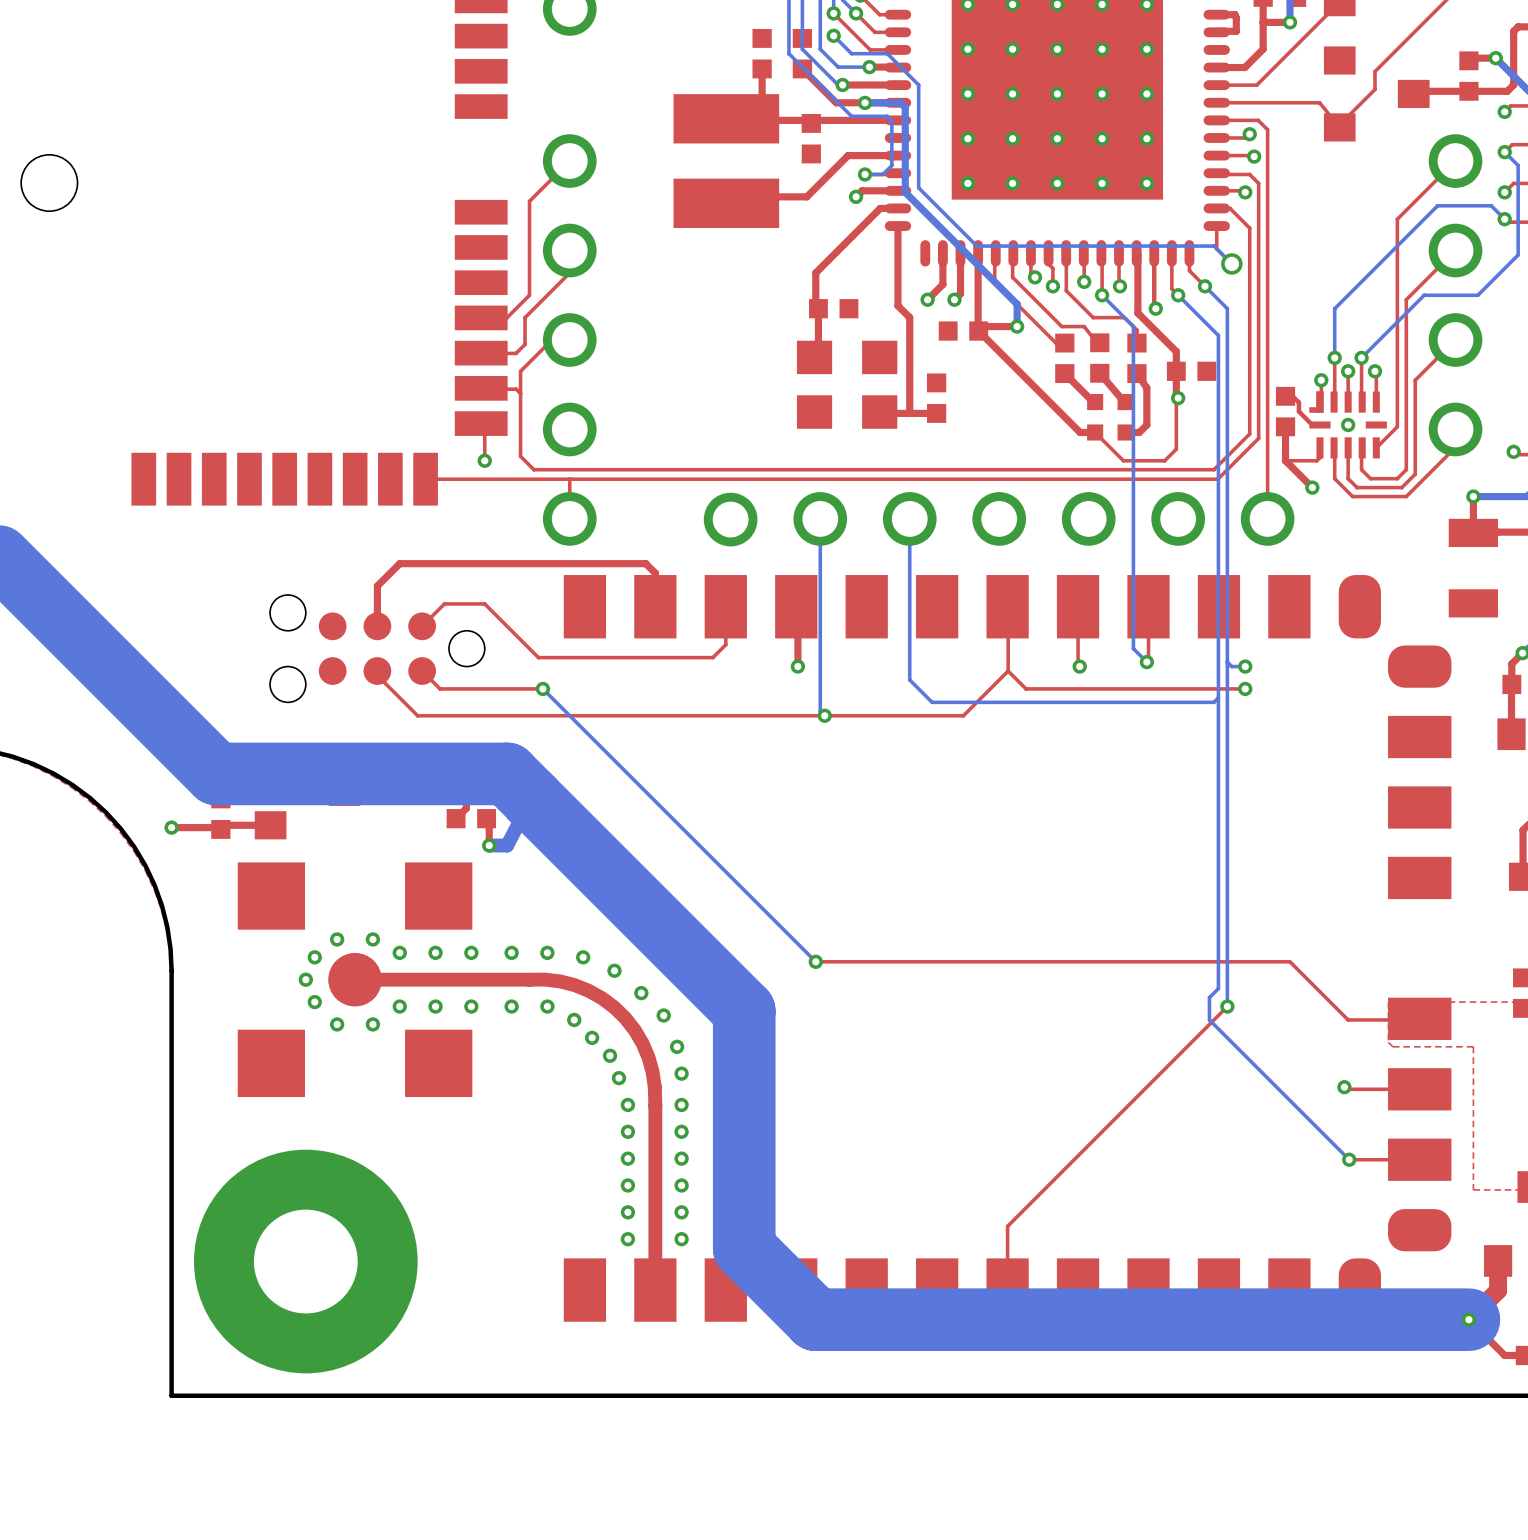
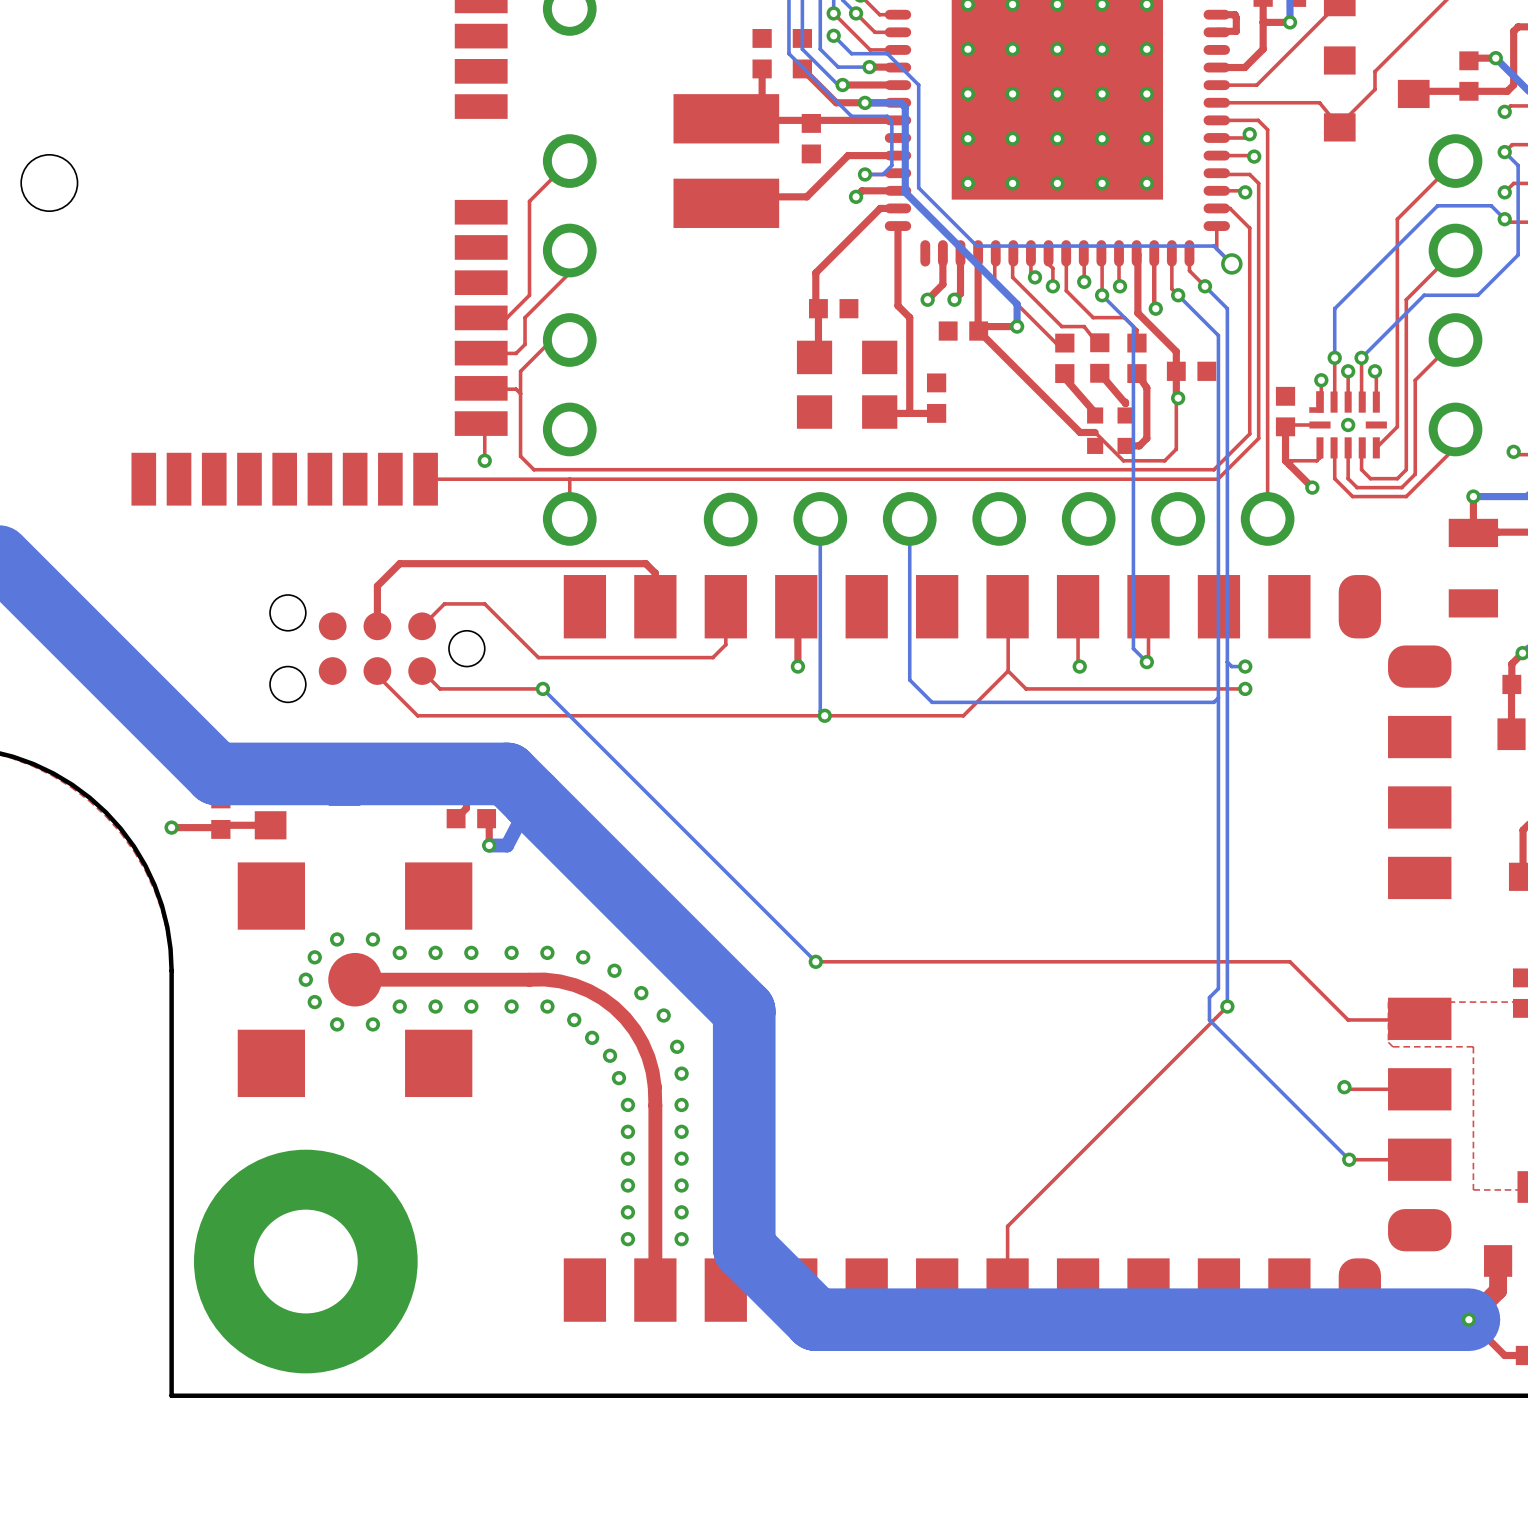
top track: (1064, 373) (1095, 403) (1095, 402) -> none
top track: none -> (1064, 378) (1095, 412) (1095, 415)
top track: (1285, 396) (1292, 396) (1298, 402) (1298, 411) (1312, 424) -> (1289, 427) (1292, 424) (1312, 424)
part position: (1110, 417) -> (1110, 430)
top track: (1146, 424) (1139, 432) (1125, 432) -> (1146, 424) (1146, 438) (1139, 445) (1125, 445)

